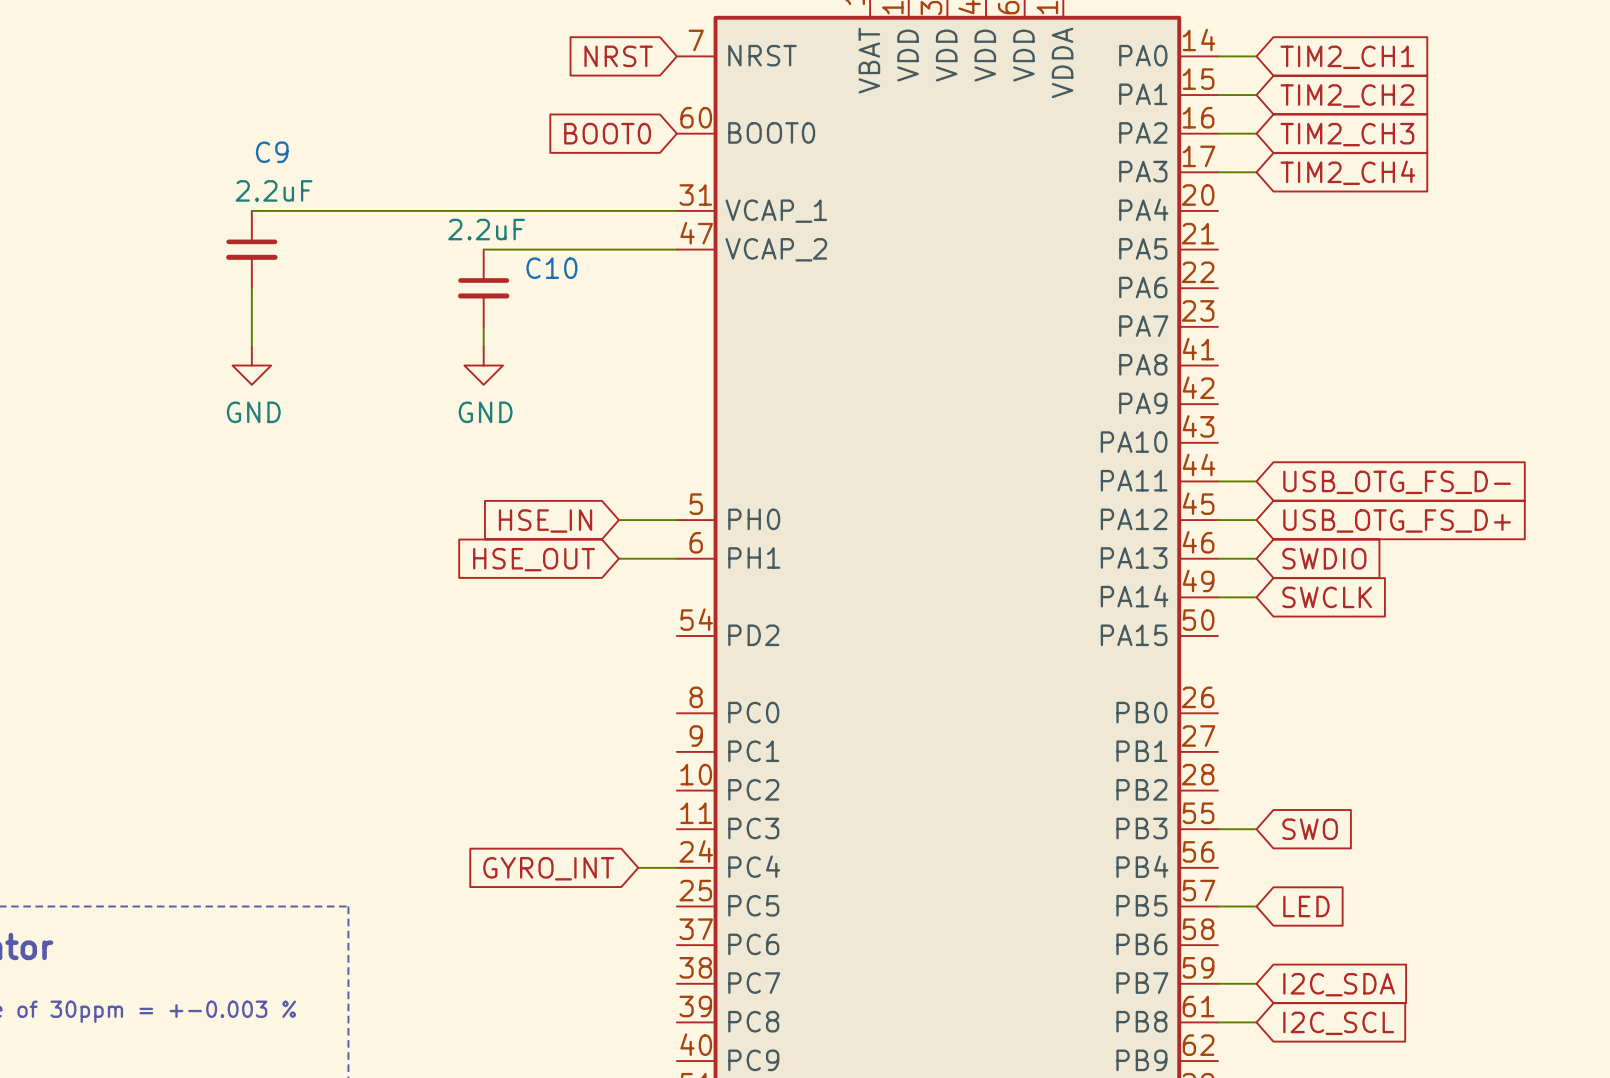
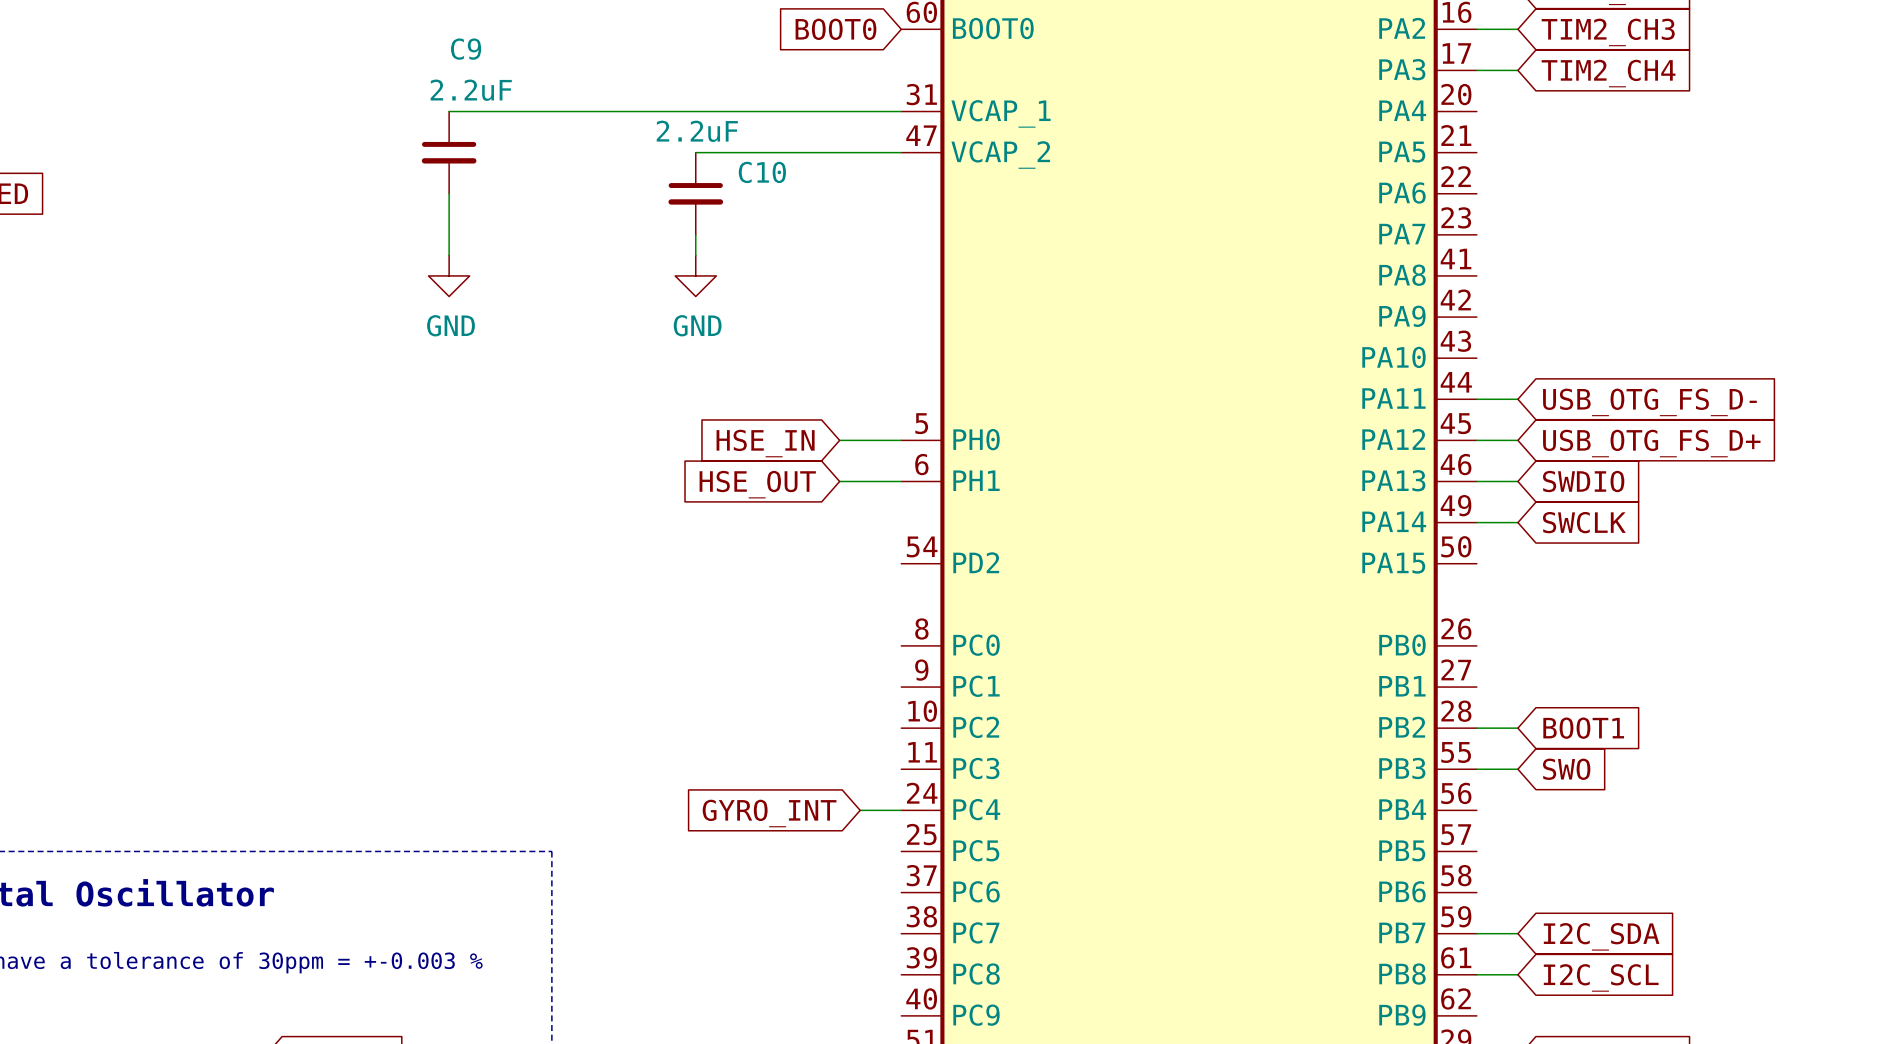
global label: none -> BOOT1 (1583, 728)
wire: (1217, 906) (1256, 906) -> (1476, 728) (1517, 728)
global label: LED (1306, 906) -> none

